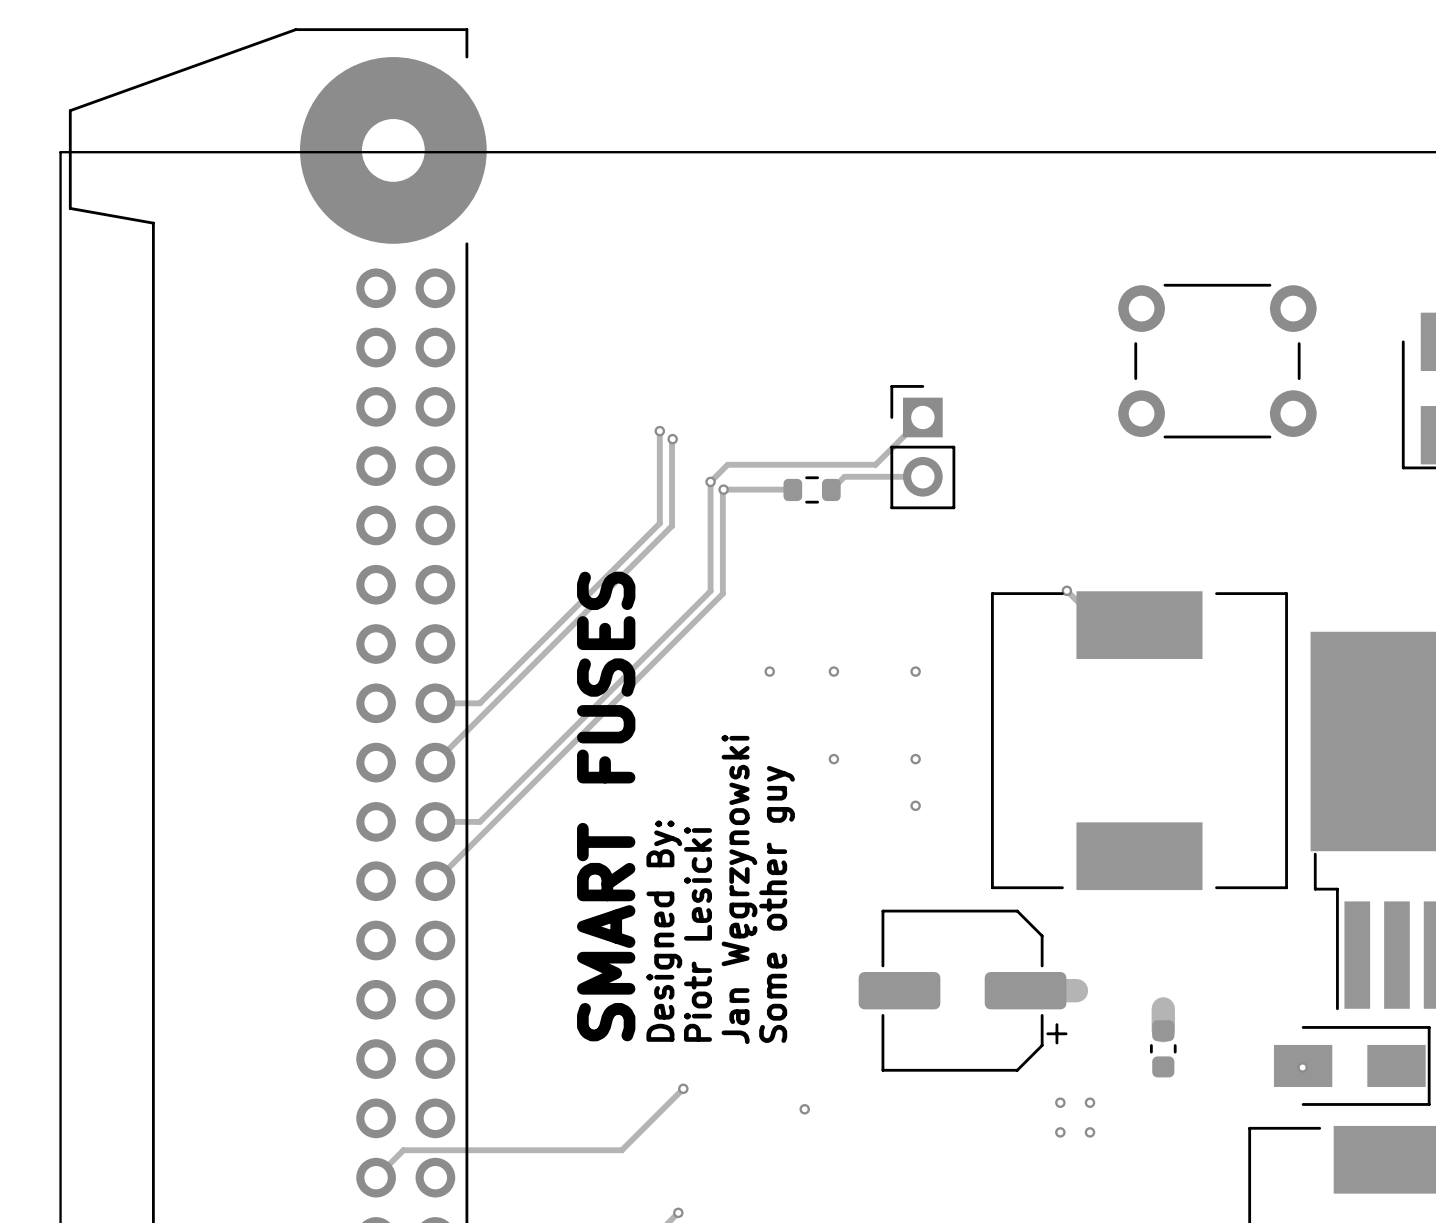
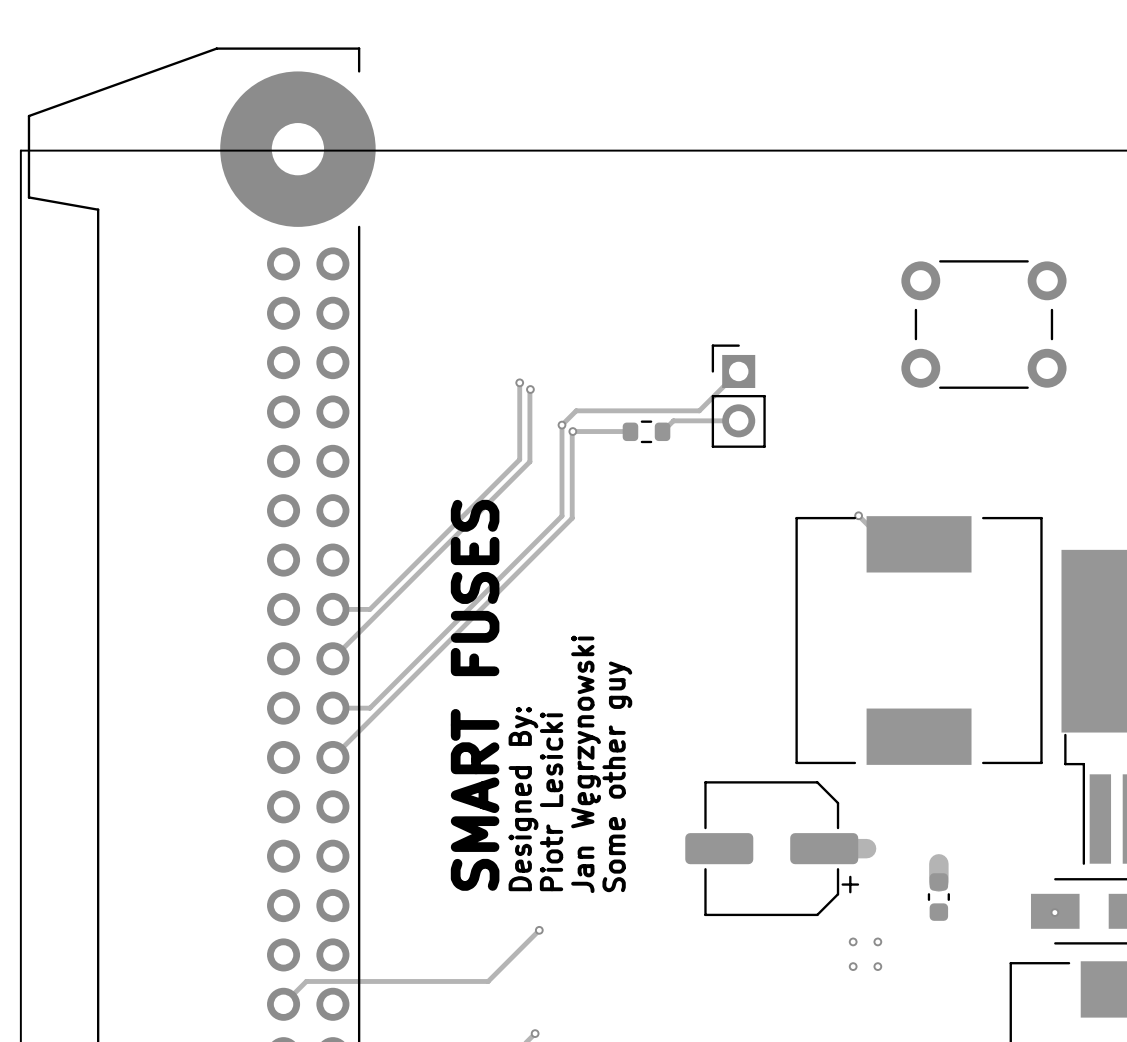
via: (769, 671) -> none
via: (833, 671) -> none
via: (915, 671) -> none
via: (833, 759) -> none
via: (915, 759) -> none
via: (915, 805) -> none
via: (804, 1109) -> none

